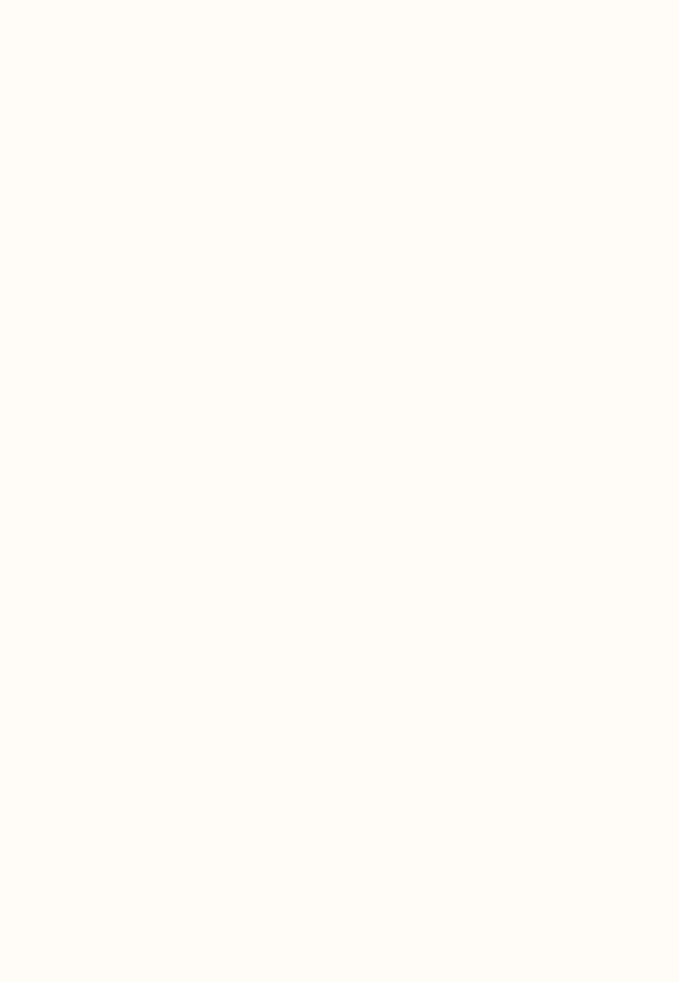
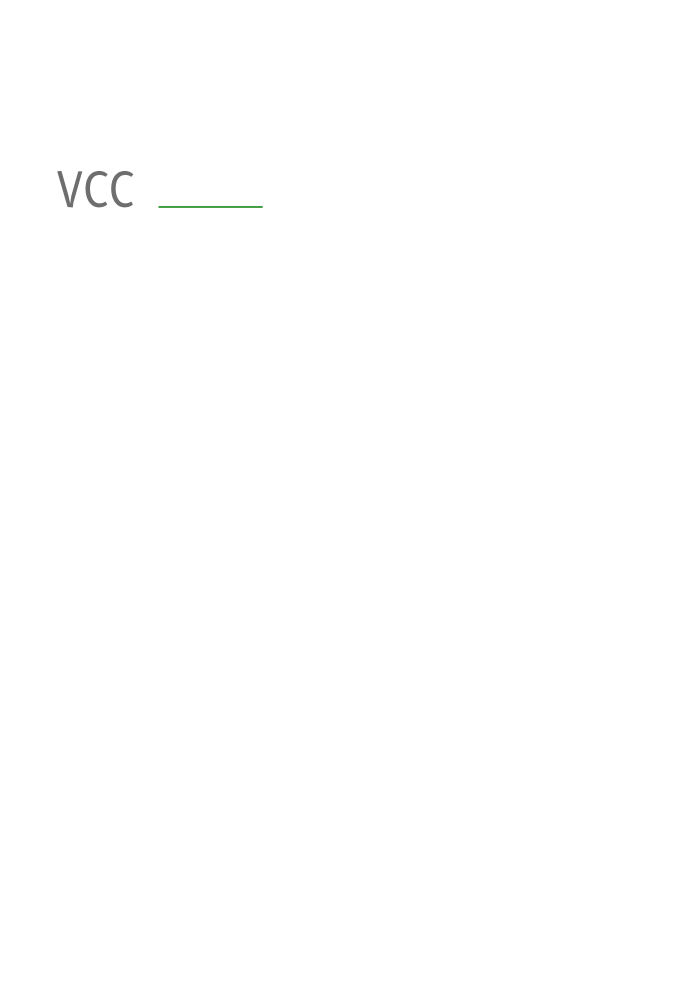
label: none -> VCC (95, 189)
wire: none -> (158, 206) (262, 206)

